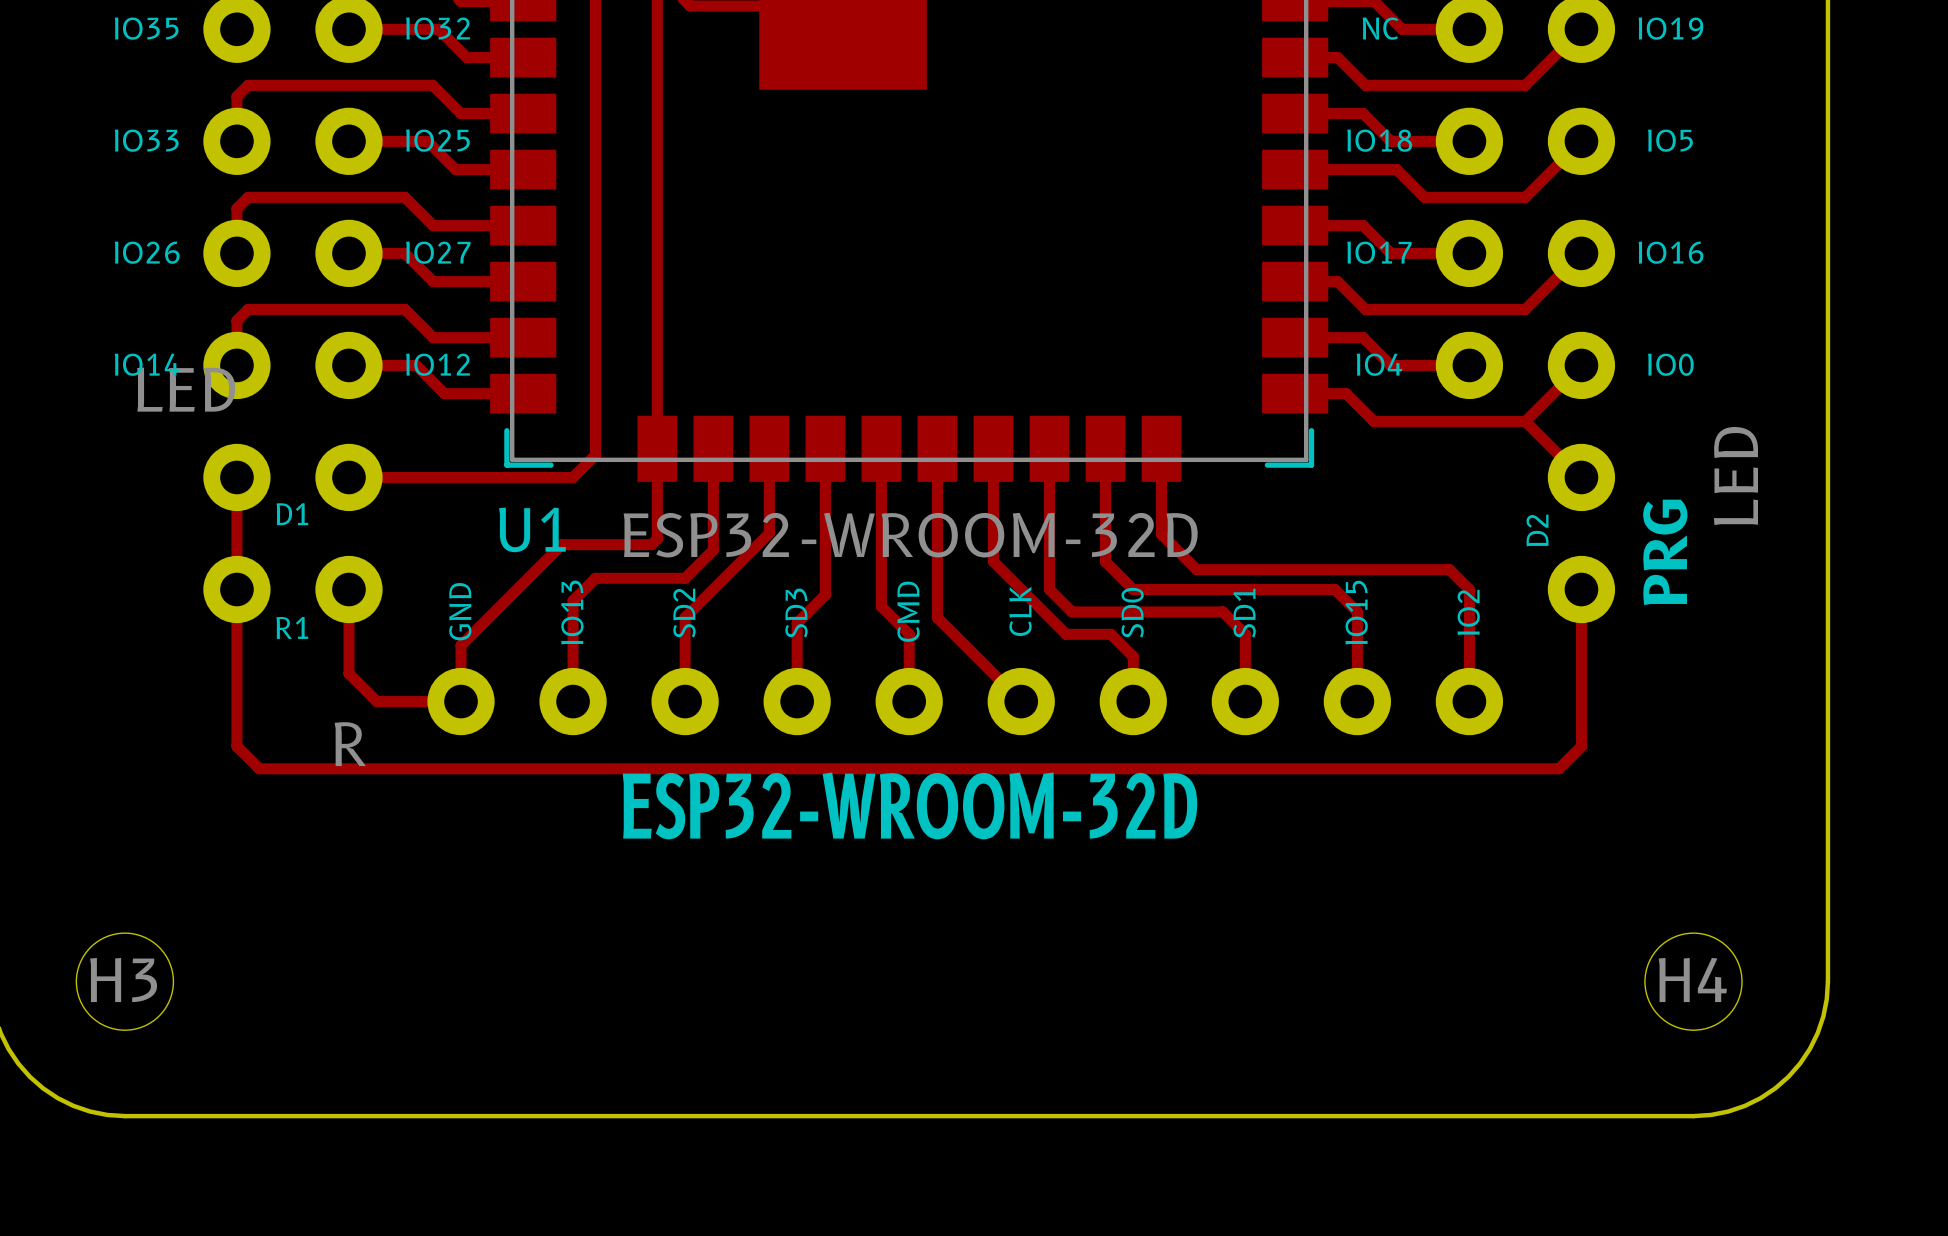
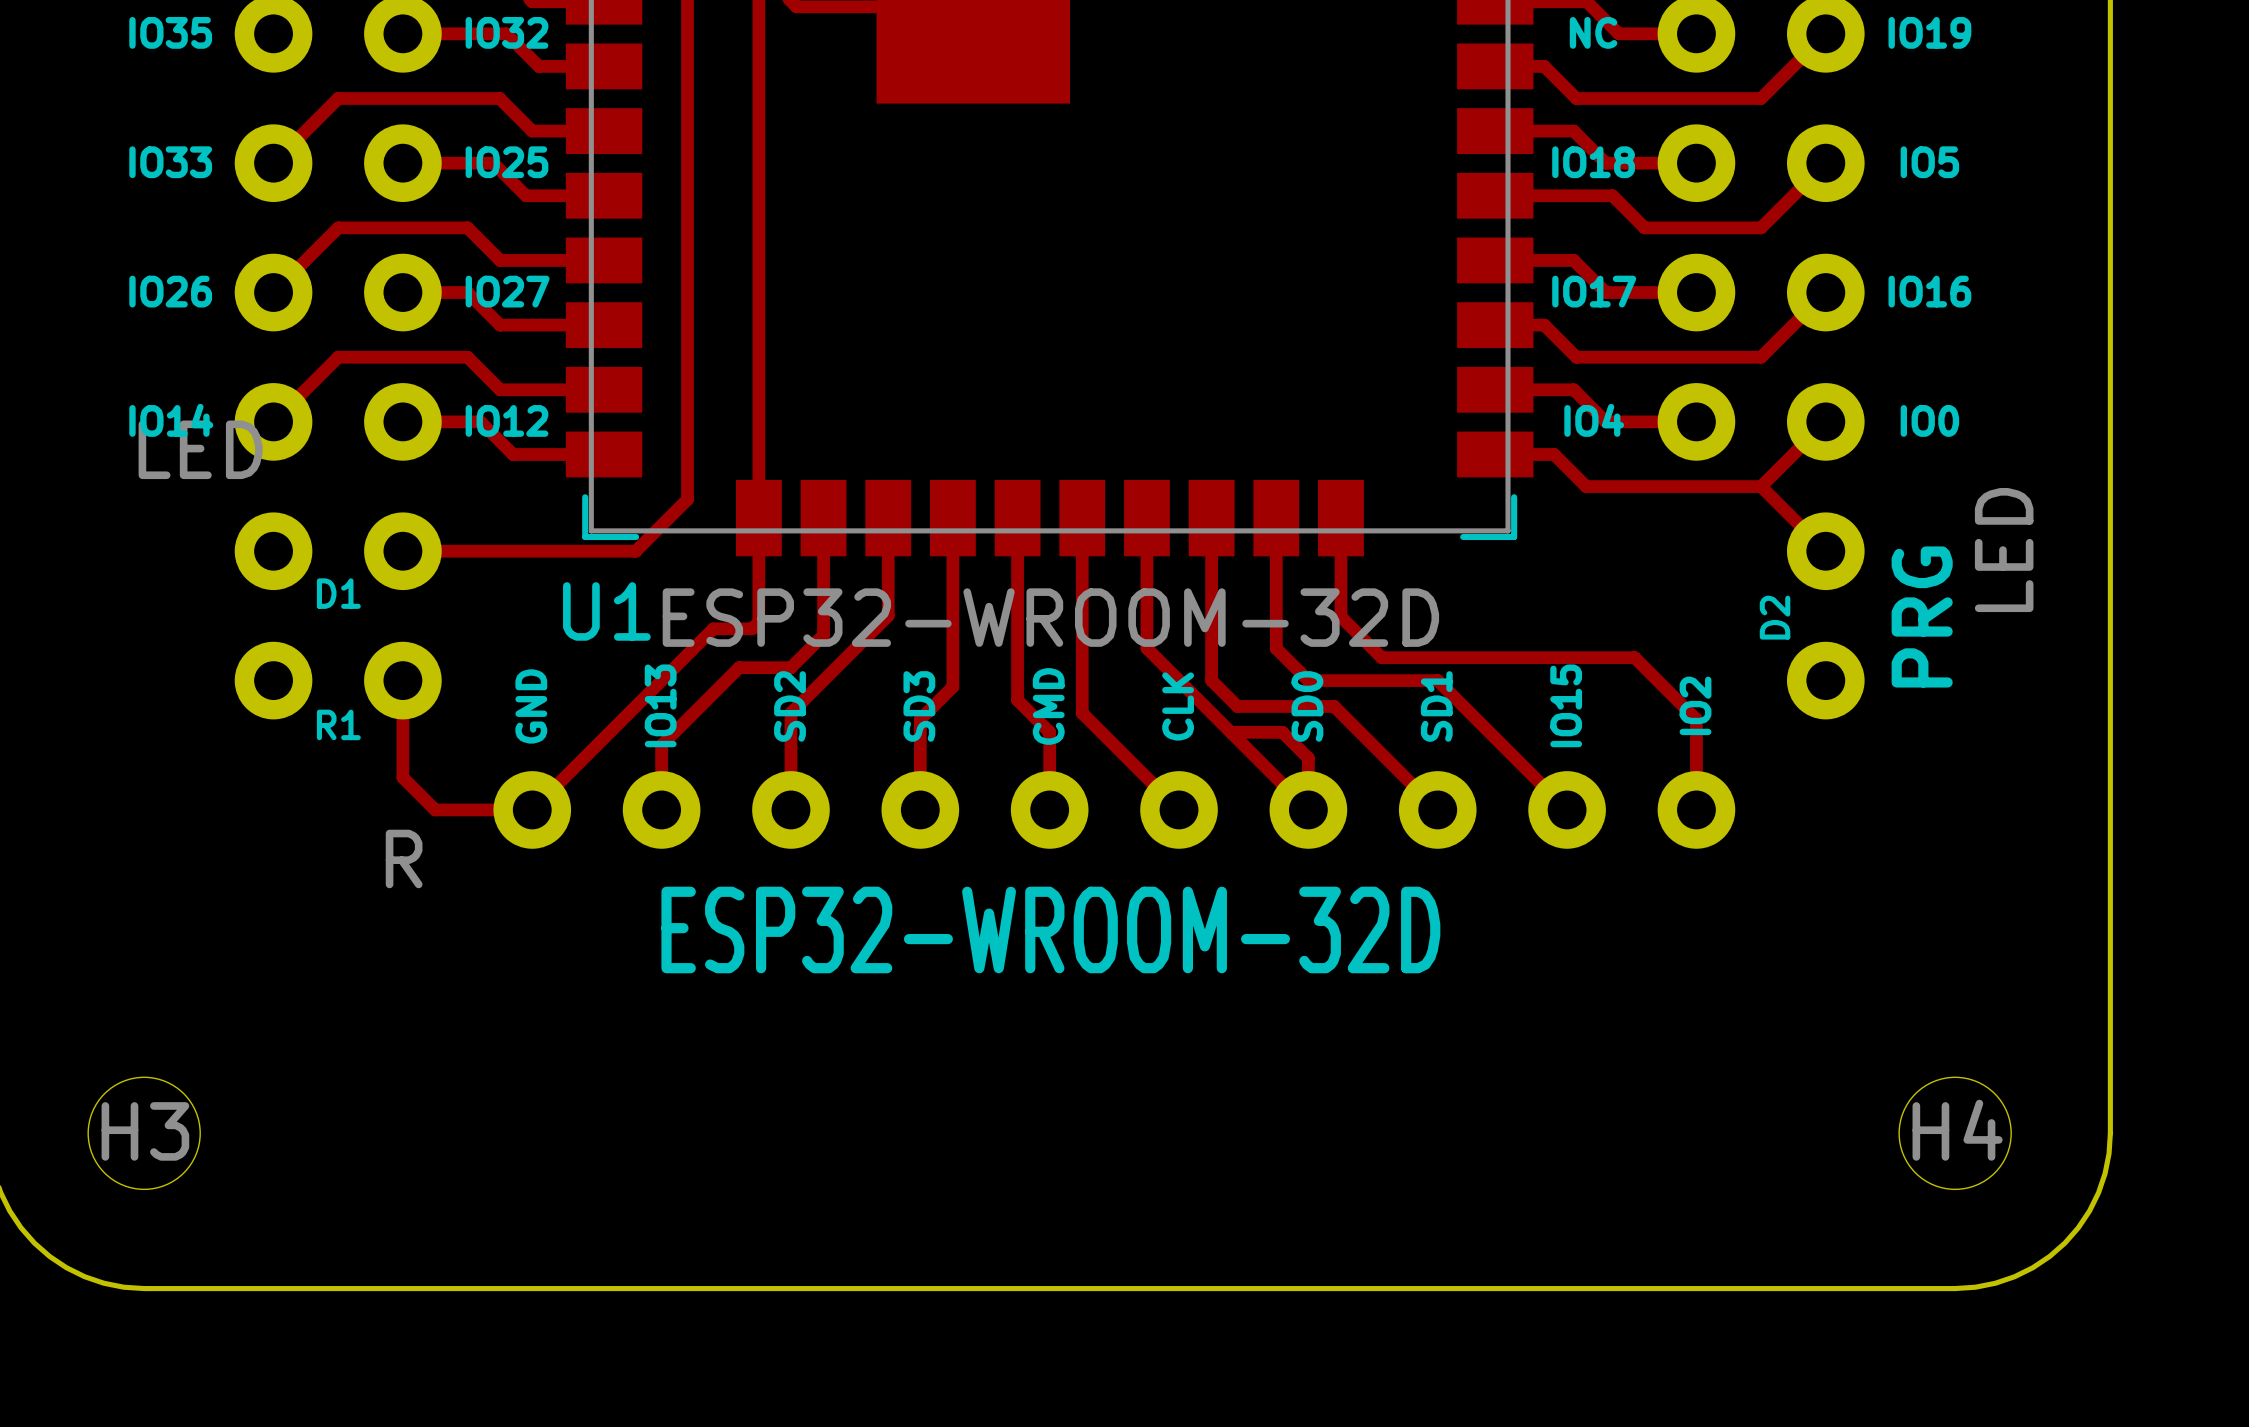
track: (292, 85) (248, 85) (236, 96) (236, 141) -> (338, 98) (273, 163)
track: (292, 197) (248, 197) (236, 208) (236, 253) -> (338, 227) (273, 292)
track: (292, 309) (248, 309) (236, 320) (236, 365) -> (338, 357) (273, 421)
track: (595, 432) (595, 455) (573, 477) (550, 477) -> (687, 499) (635, 551)
track: (236, 477) (236, 746) (259, 768) (1559, 768) (1581, 746) (1581, 589) -> none
track: (617, 544) (561, 544) (461, 645) (461, 701) -> (713, 628) (532, 809)
track: (993, 561) (1066, 634) -> (1146, 648) (1308, 809)
track: (1415, 569) (1449, 569) (1469, 589) (1469, 623) -> (1634, 657) (1696, 719)
track: (640, 578) (595, 578) (573, 600) (573, 645) -> (739, 667) (661, 745)
track: (1245, 589) (1334, 589) (1357, 611) (1357, 701) -> (1437, 680) (1567, 809)
track: (1155, 611) (1222, 611) (1245, 634) (1245, 701) -> (1334, 706) (1437, 809)

